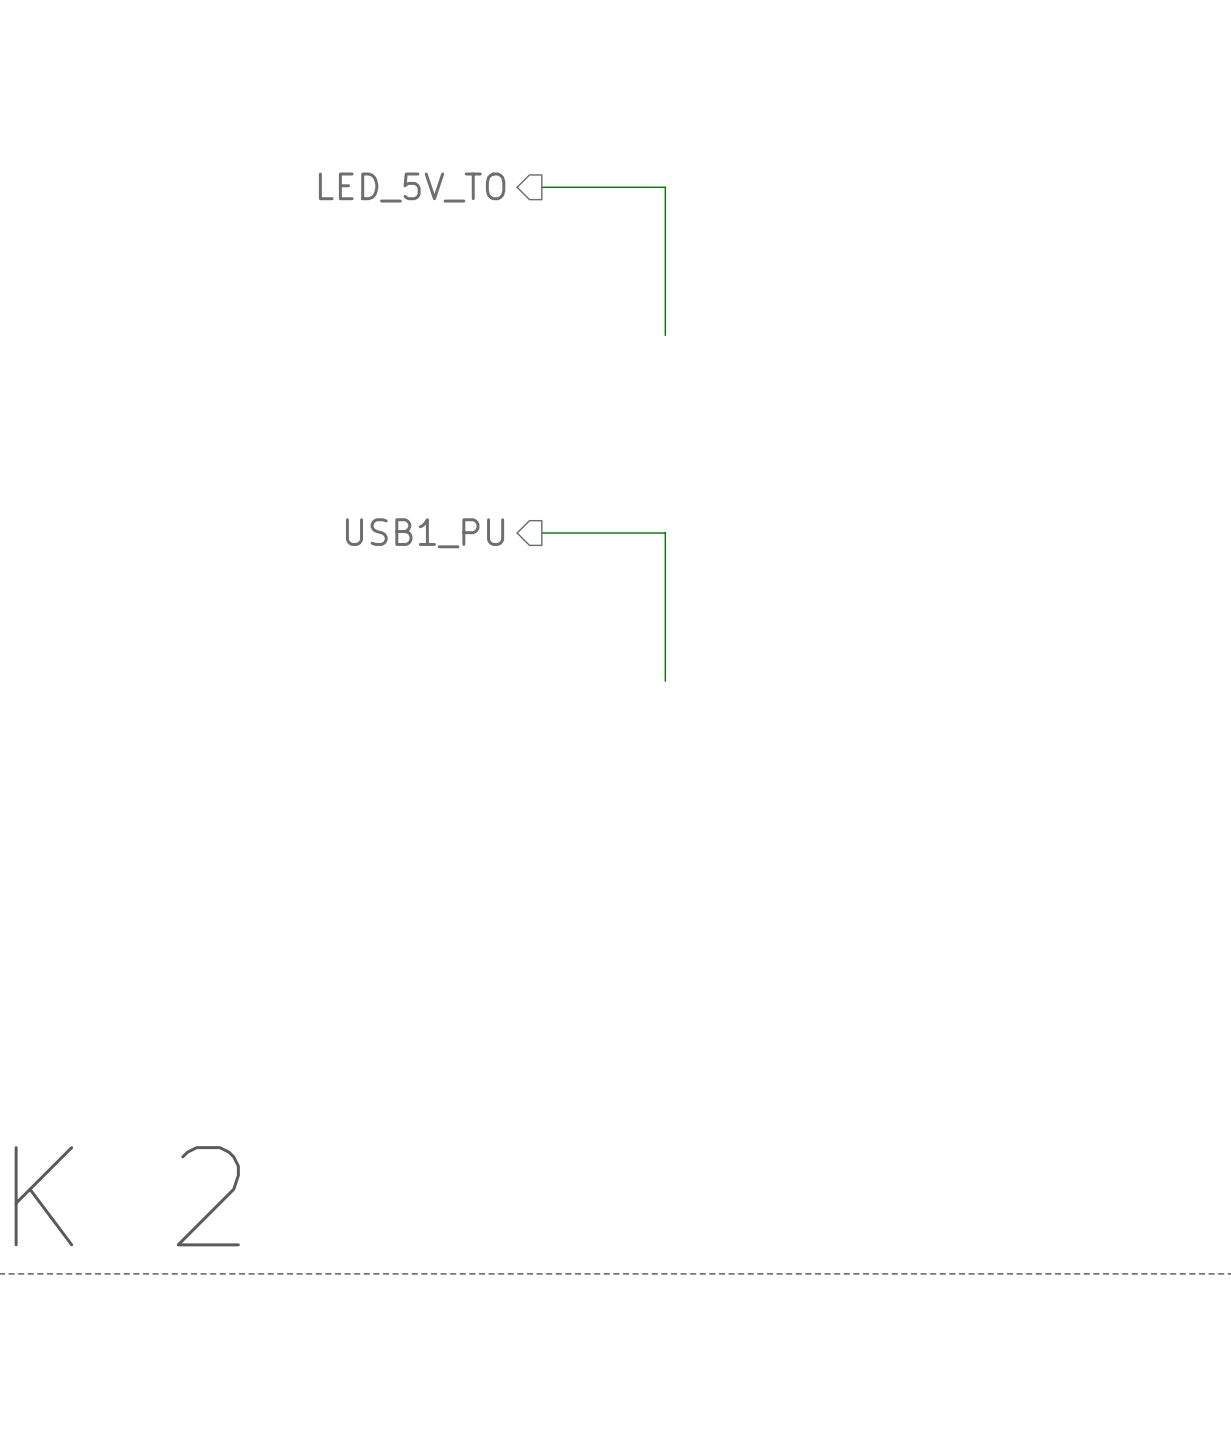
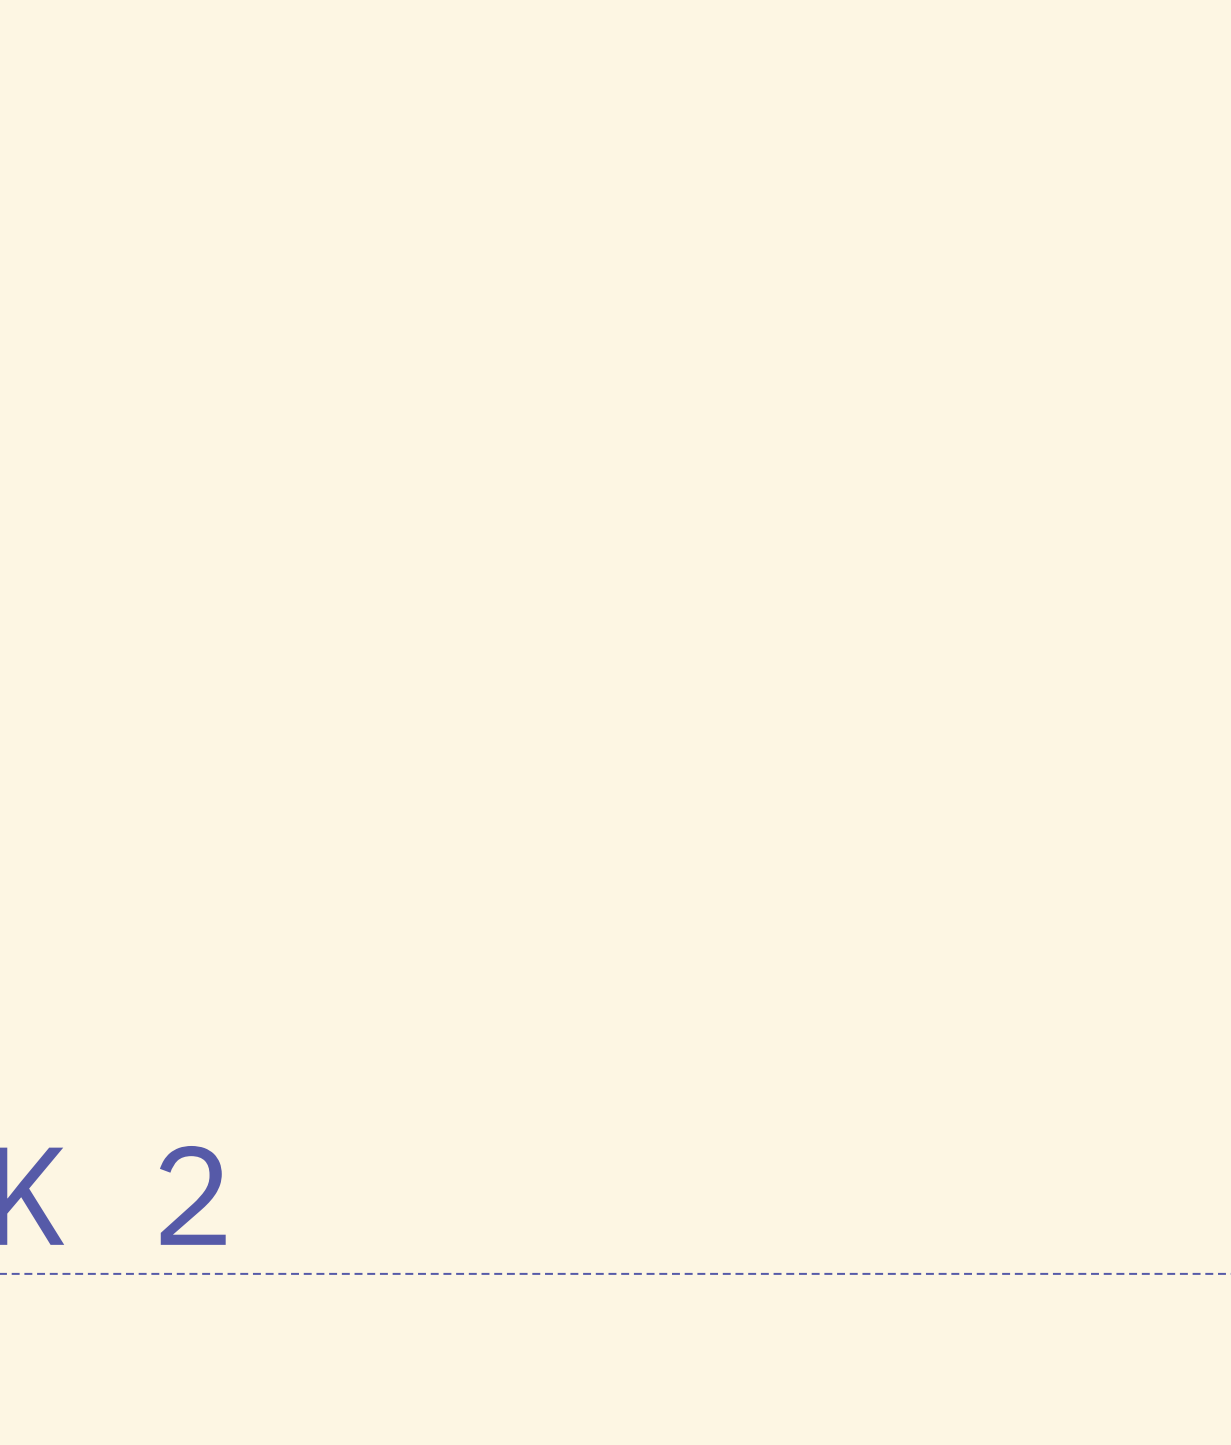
hierarchical label: LED_5V_TO (412, 187) -> none
wire: (541, 187) (665, 187) (665, 335) -> none
hierarchical label: USB1_PU (425, 533) -> none
wire: (541, 533) (665, 533) (665, 681) -> none

